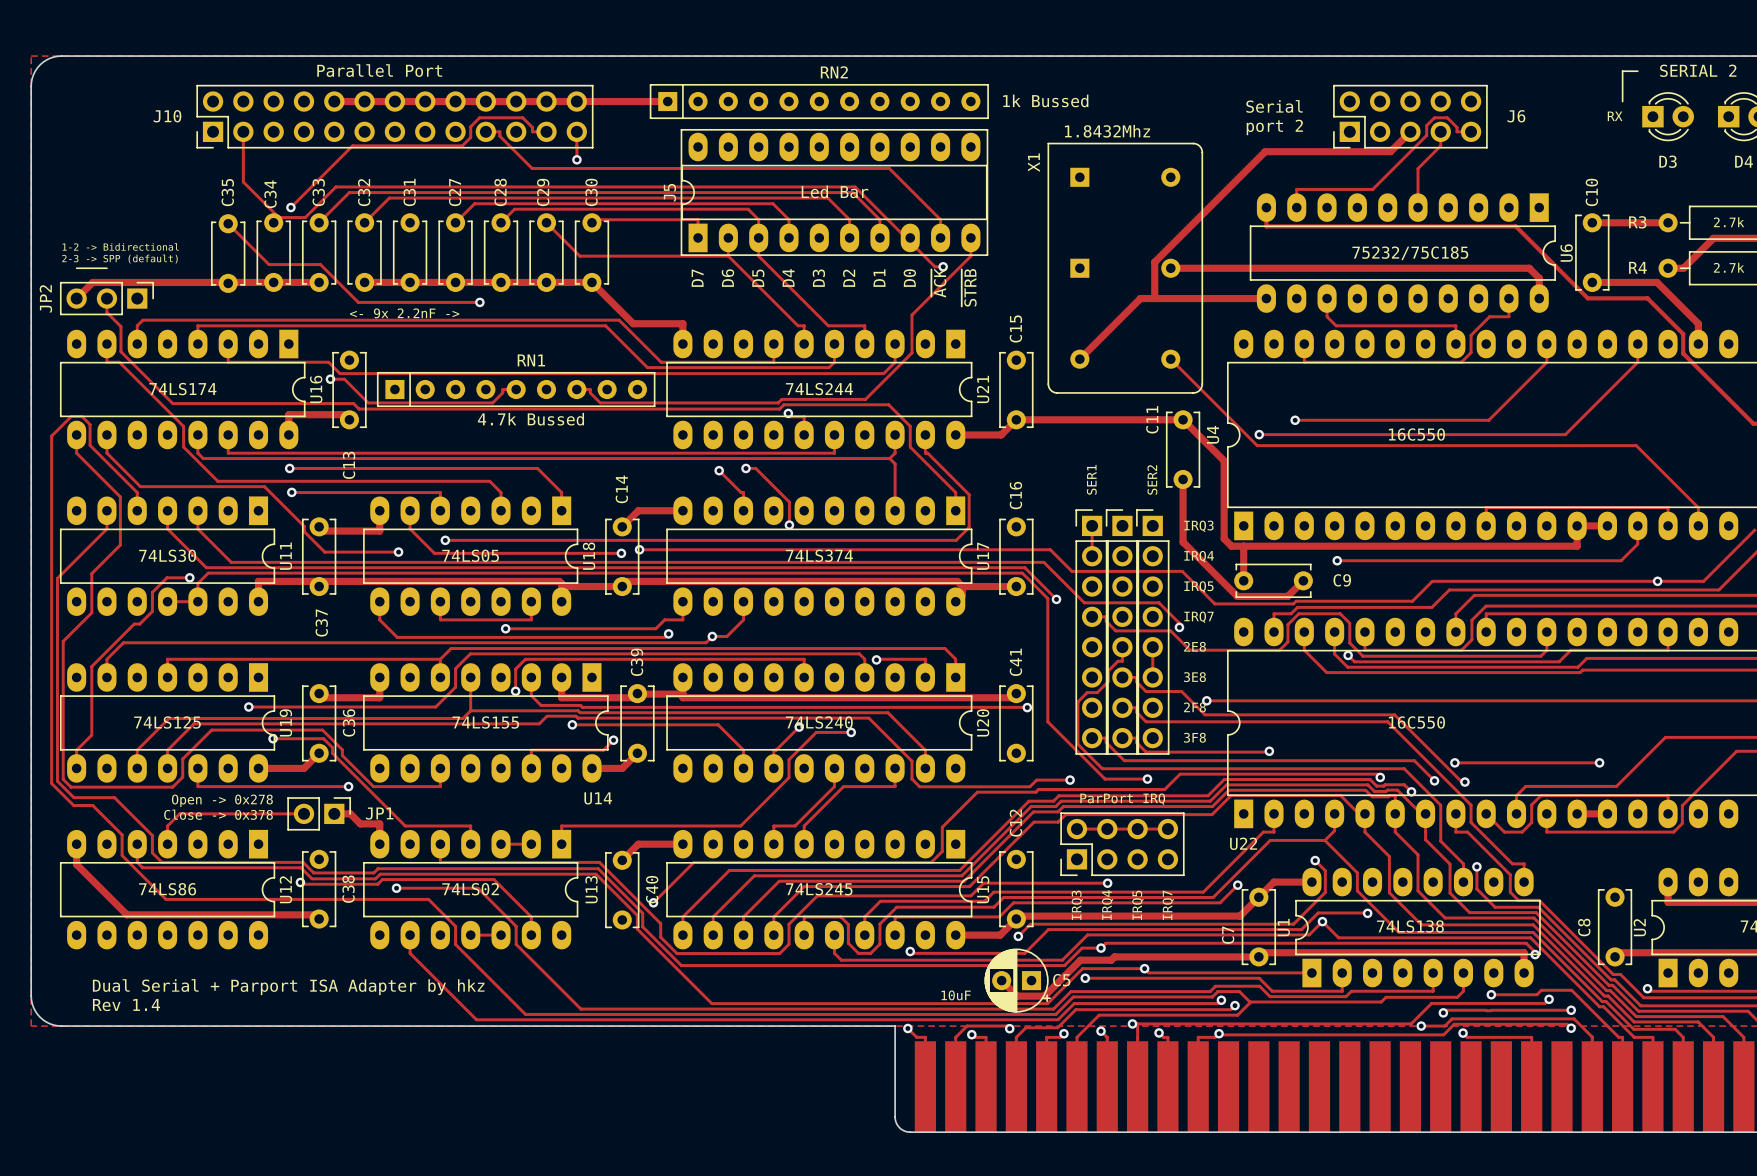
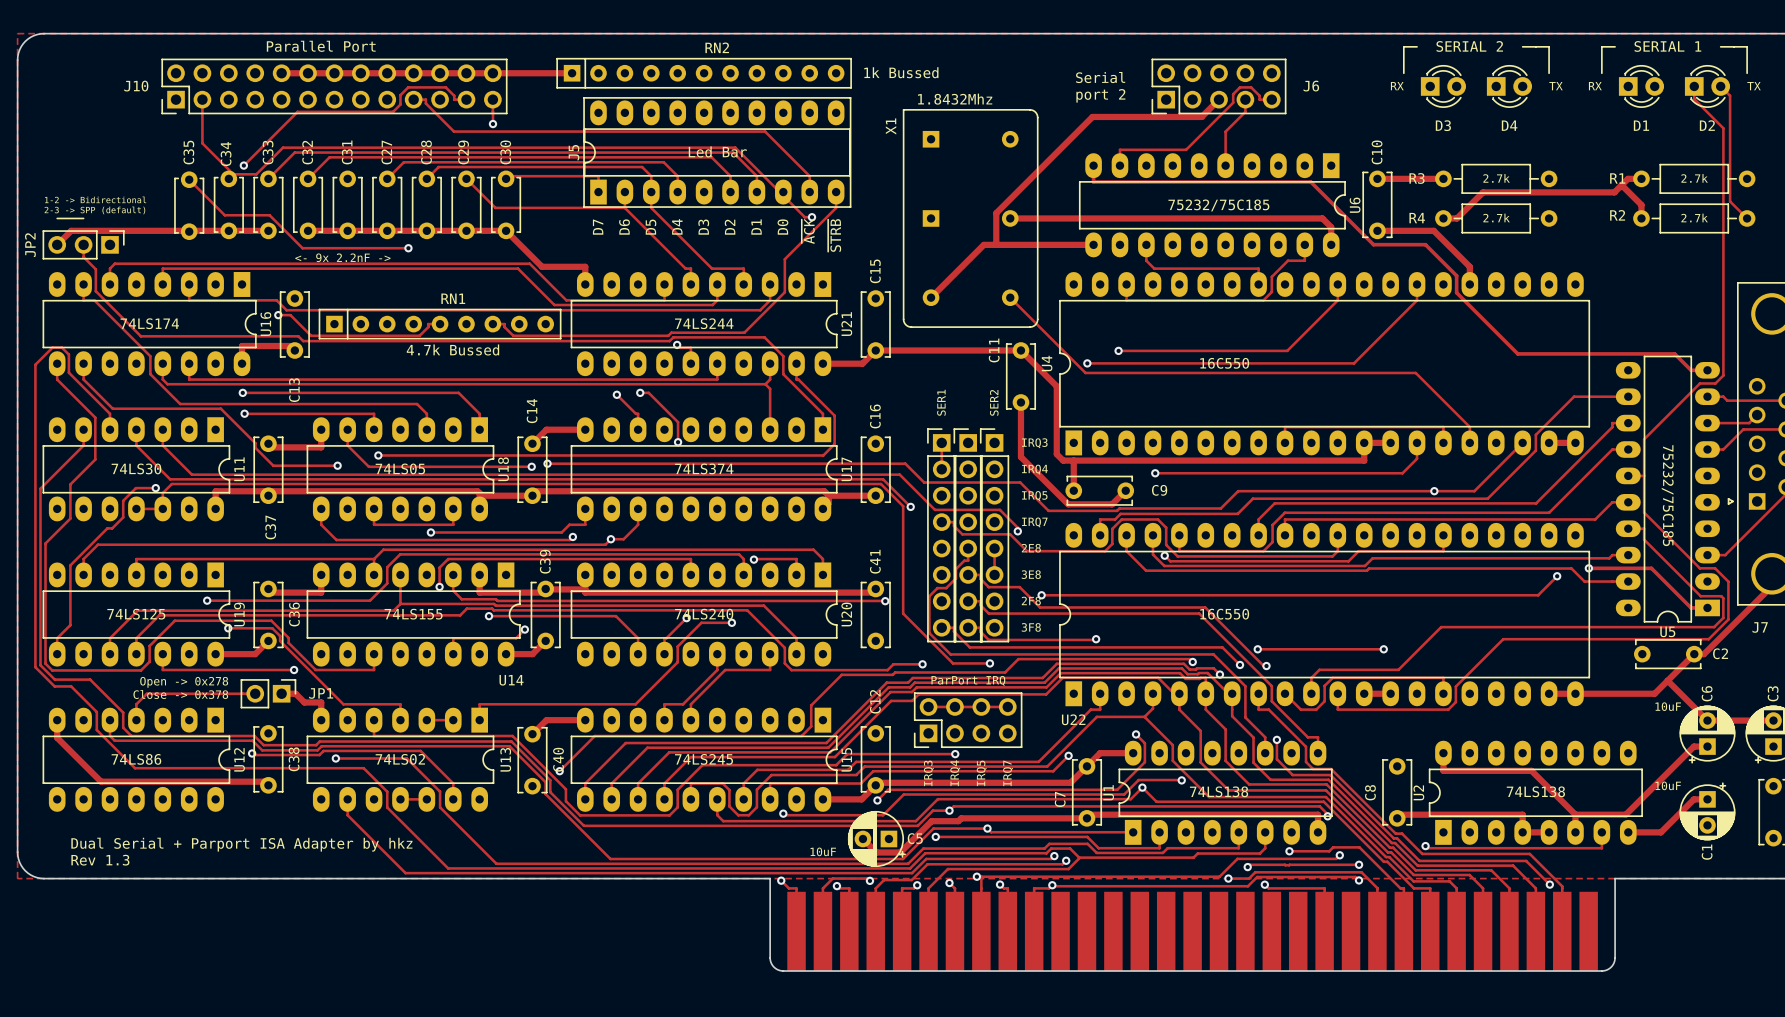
text: Rev 1.4 (126, 1005) -> Rev 1.3 (100, 860)

